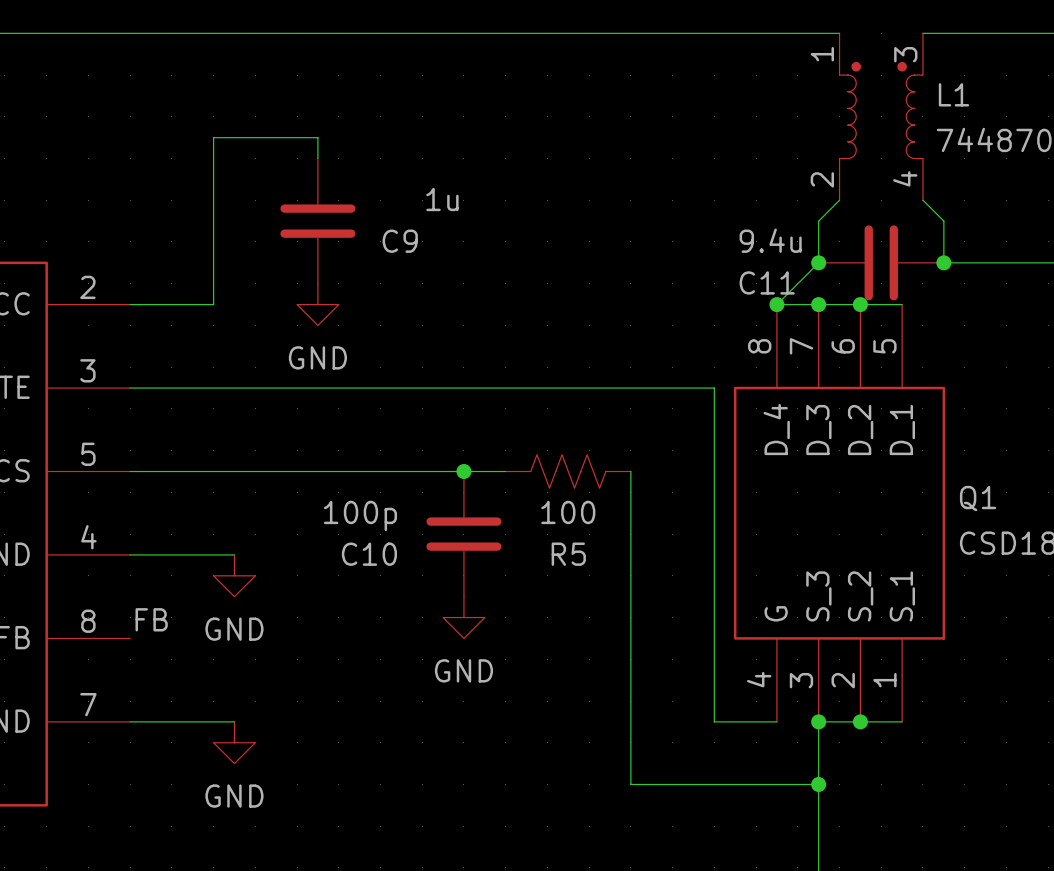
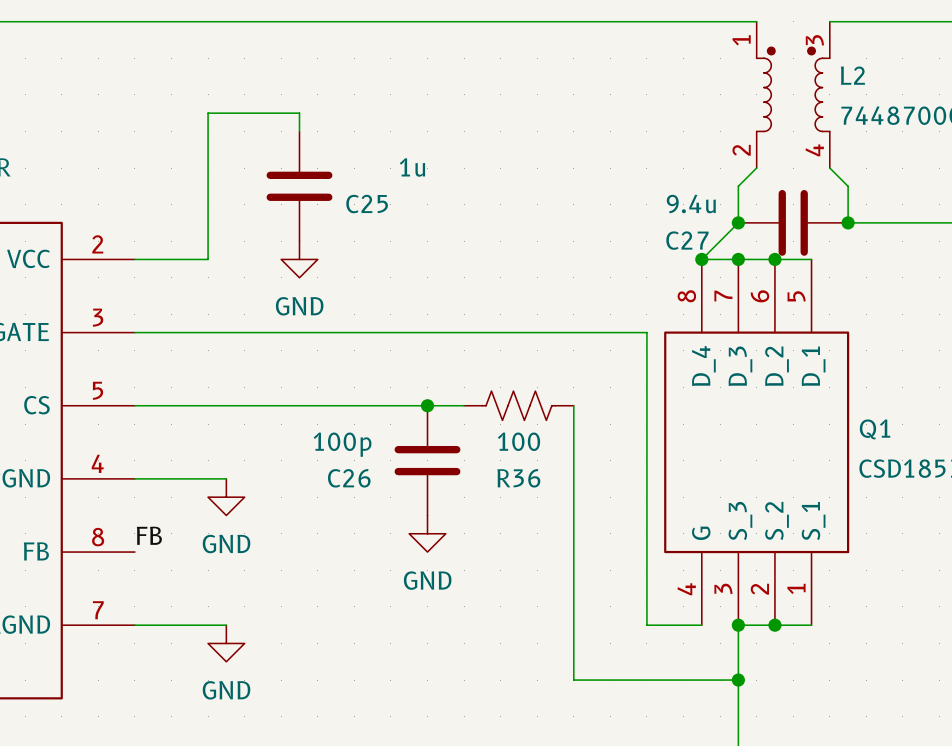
L1 name: L1 (953, 94) -> L2 (852, 75)
C9 name: C9 (400, 241) -> C25 (367, 204)
C11 name: C11 (767, 282) -> C27 (687, 240)
C10 name: C10 (369, 554) -> C26 (349, 478)
R5 name: R5 (568, 554) -> R36 (518, 478)

